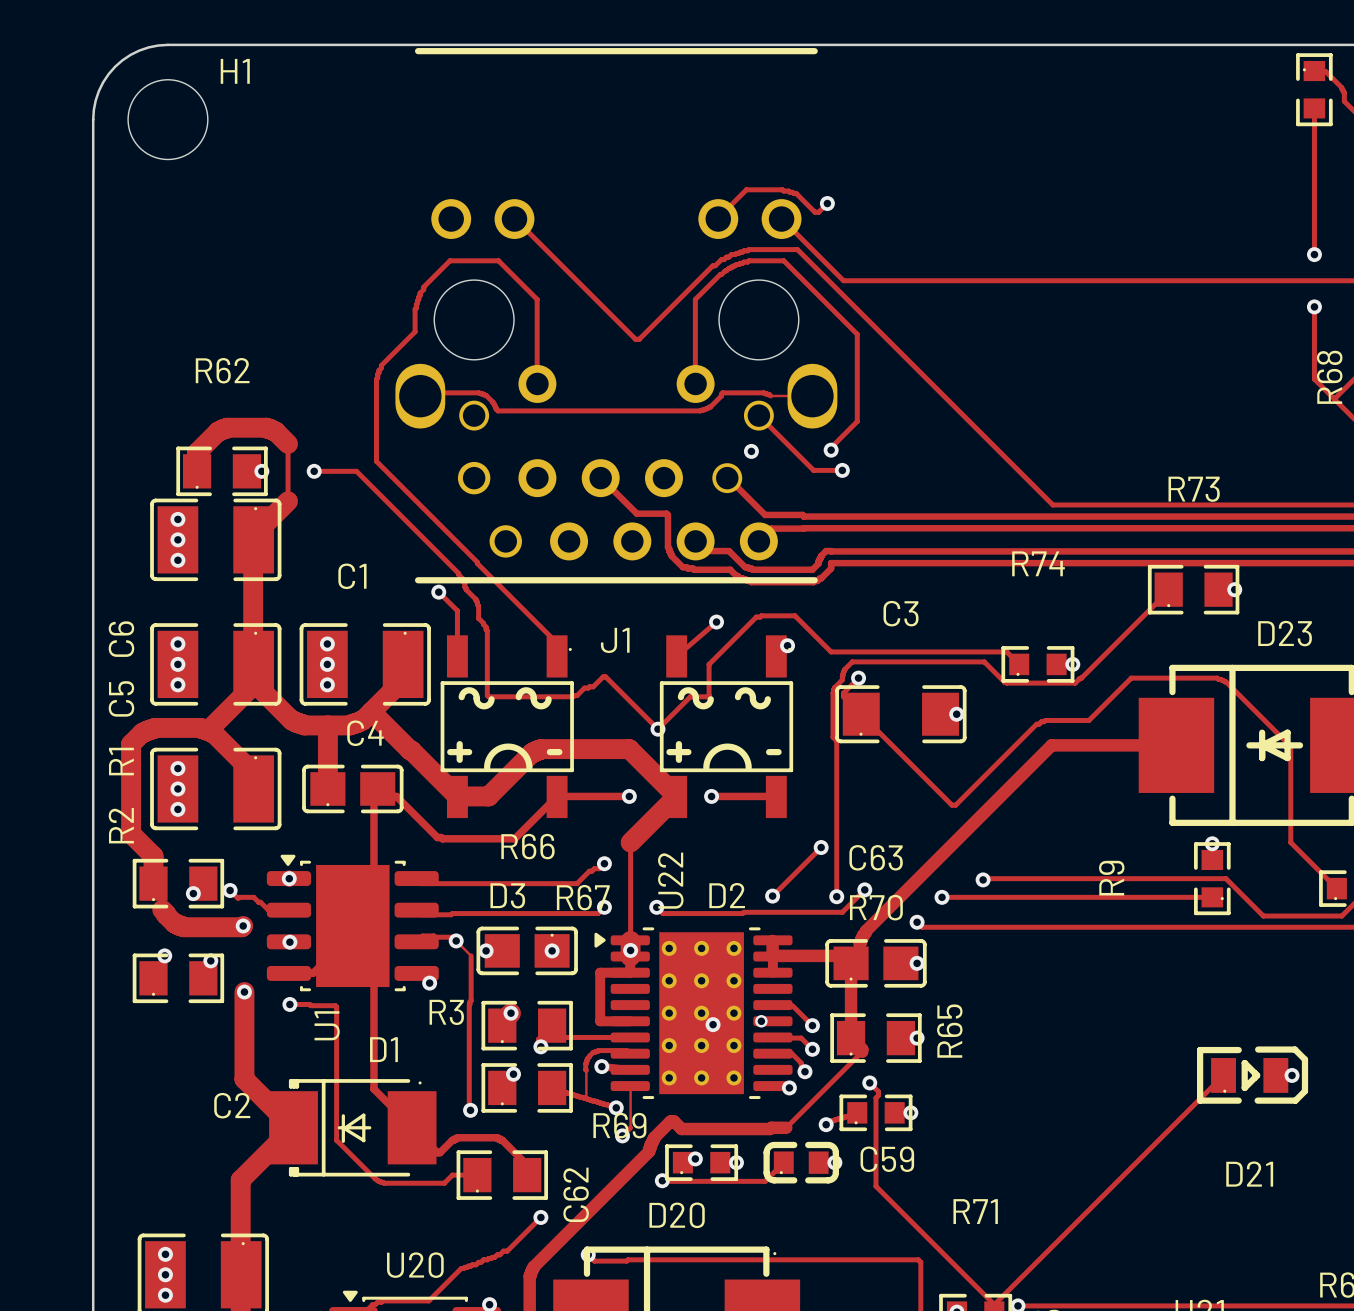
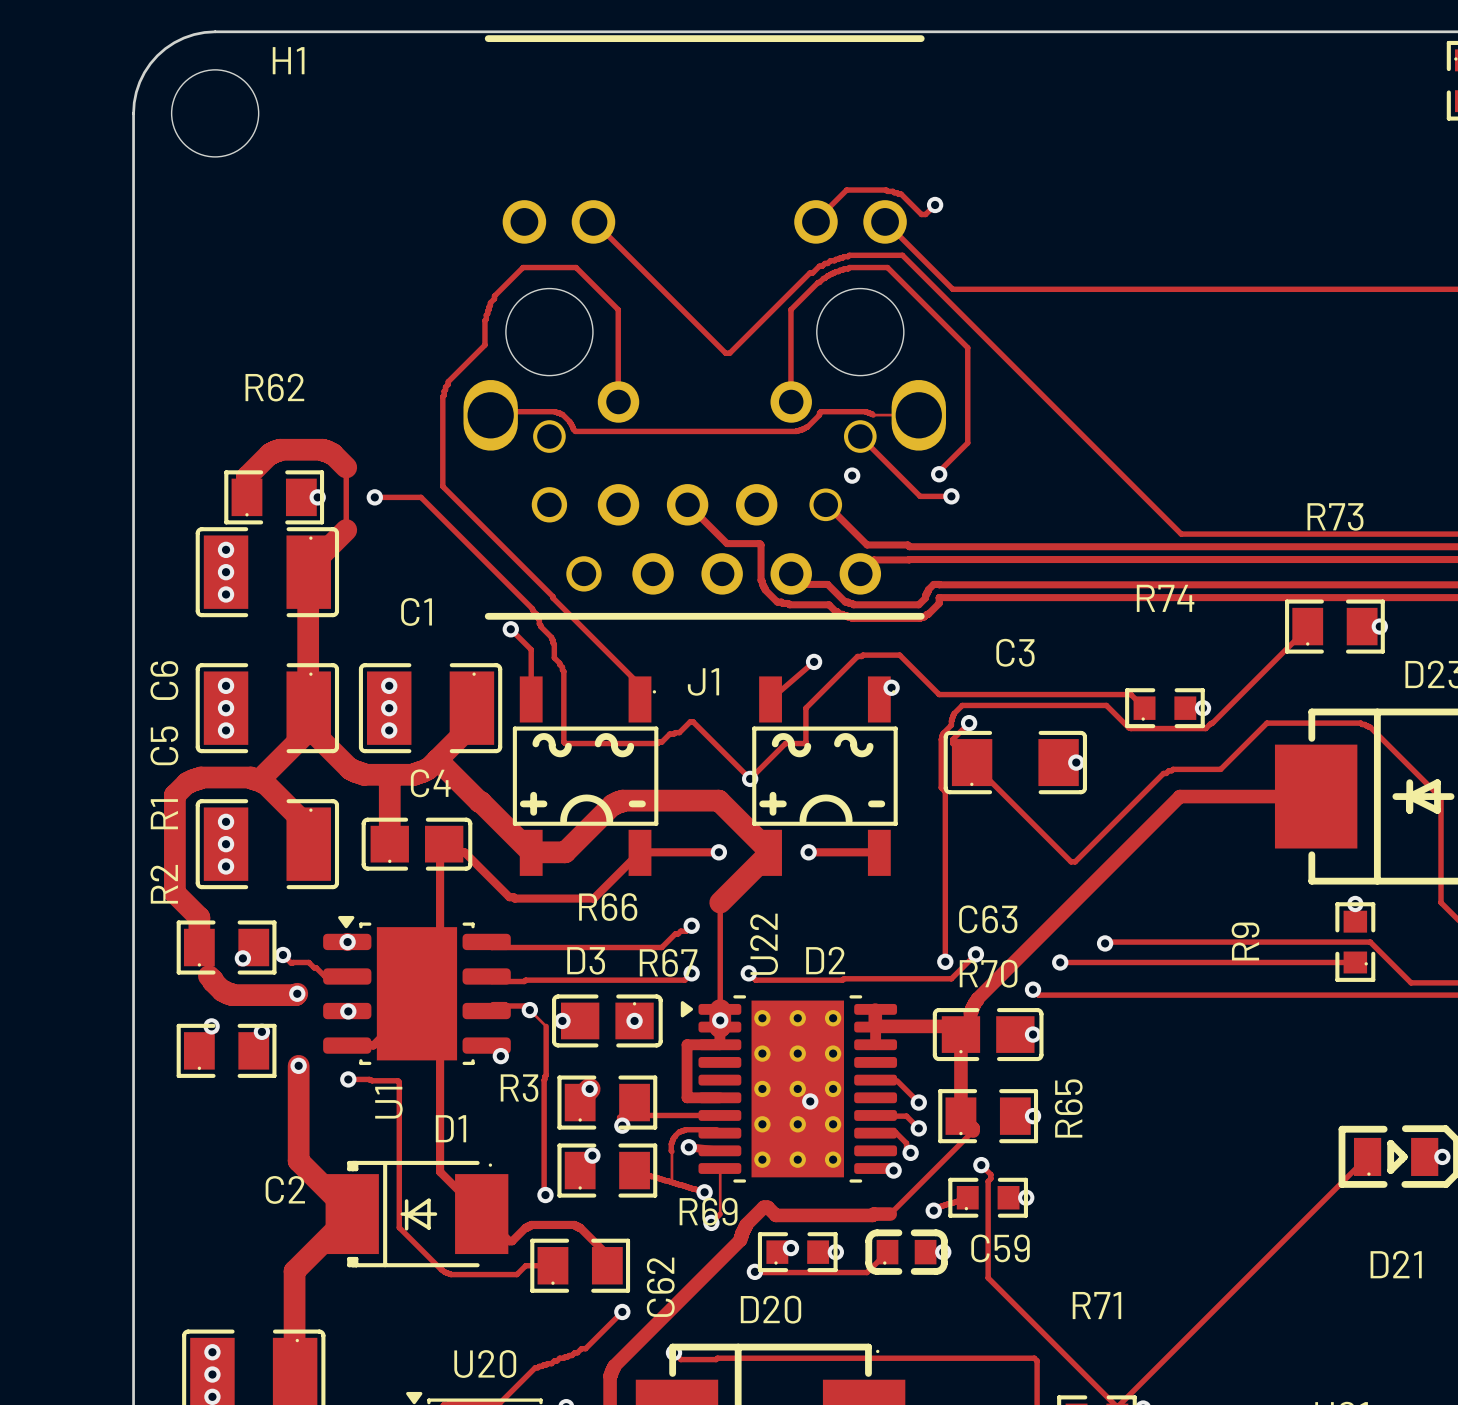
track: (821, 847) (772, 896) -> none
via: (821, 847) -> none
via: (772, 896) -> none
via: (761, 1021) -> none

